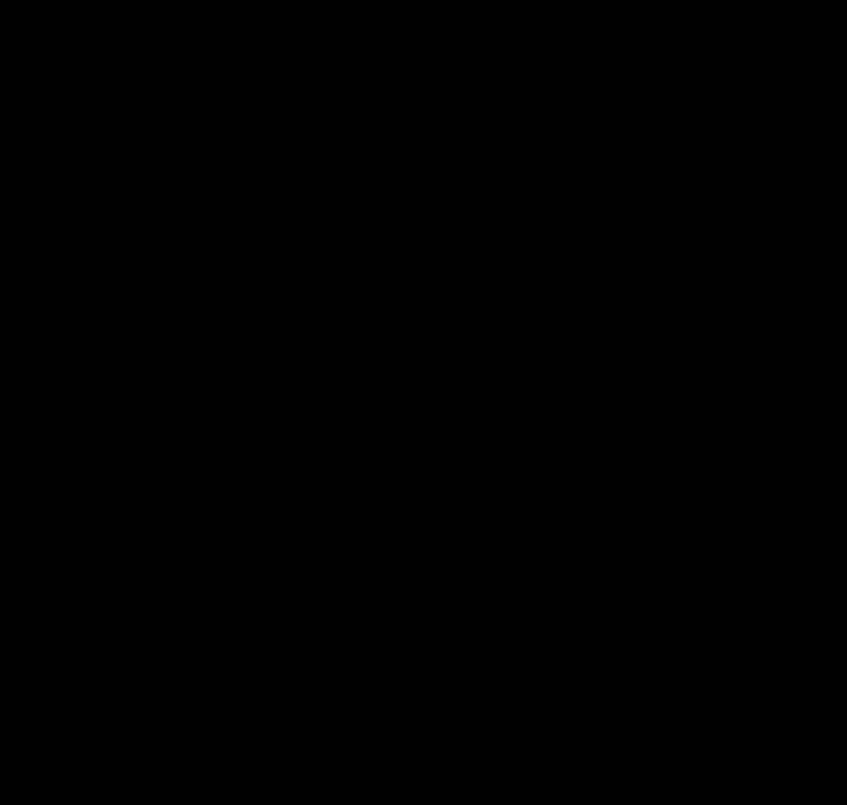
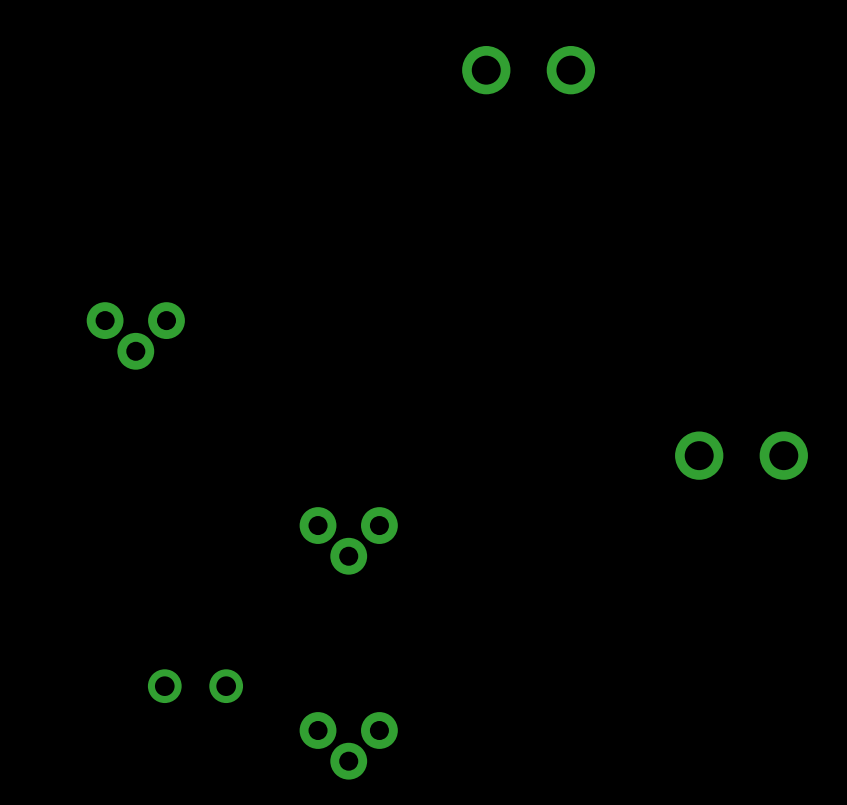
part: none -> (528, 70)
part: none -> (135, 335)
part: none -> (741, 455)
part: none -> (348, 540)
part: none -> (195, 686)
part: none -> (348, 745)

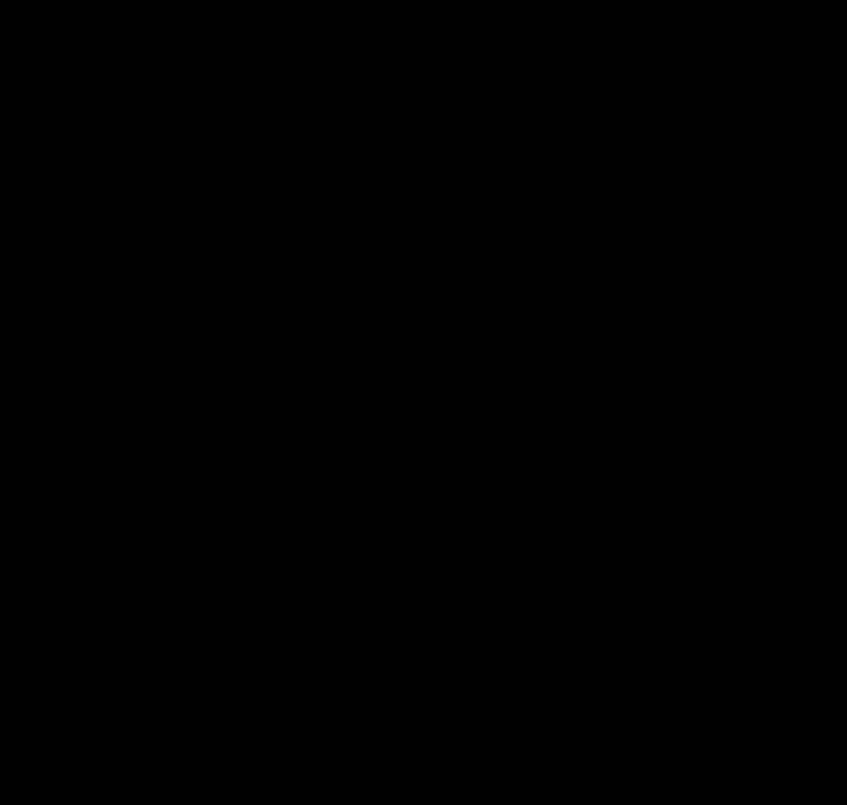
part: (528, 70) -> none
part: (135, 335) -> none
part: (741, 455) -> none
part: (348, 540) -> none
part: (195, 686) -> none
part: (348, 745) -> none

